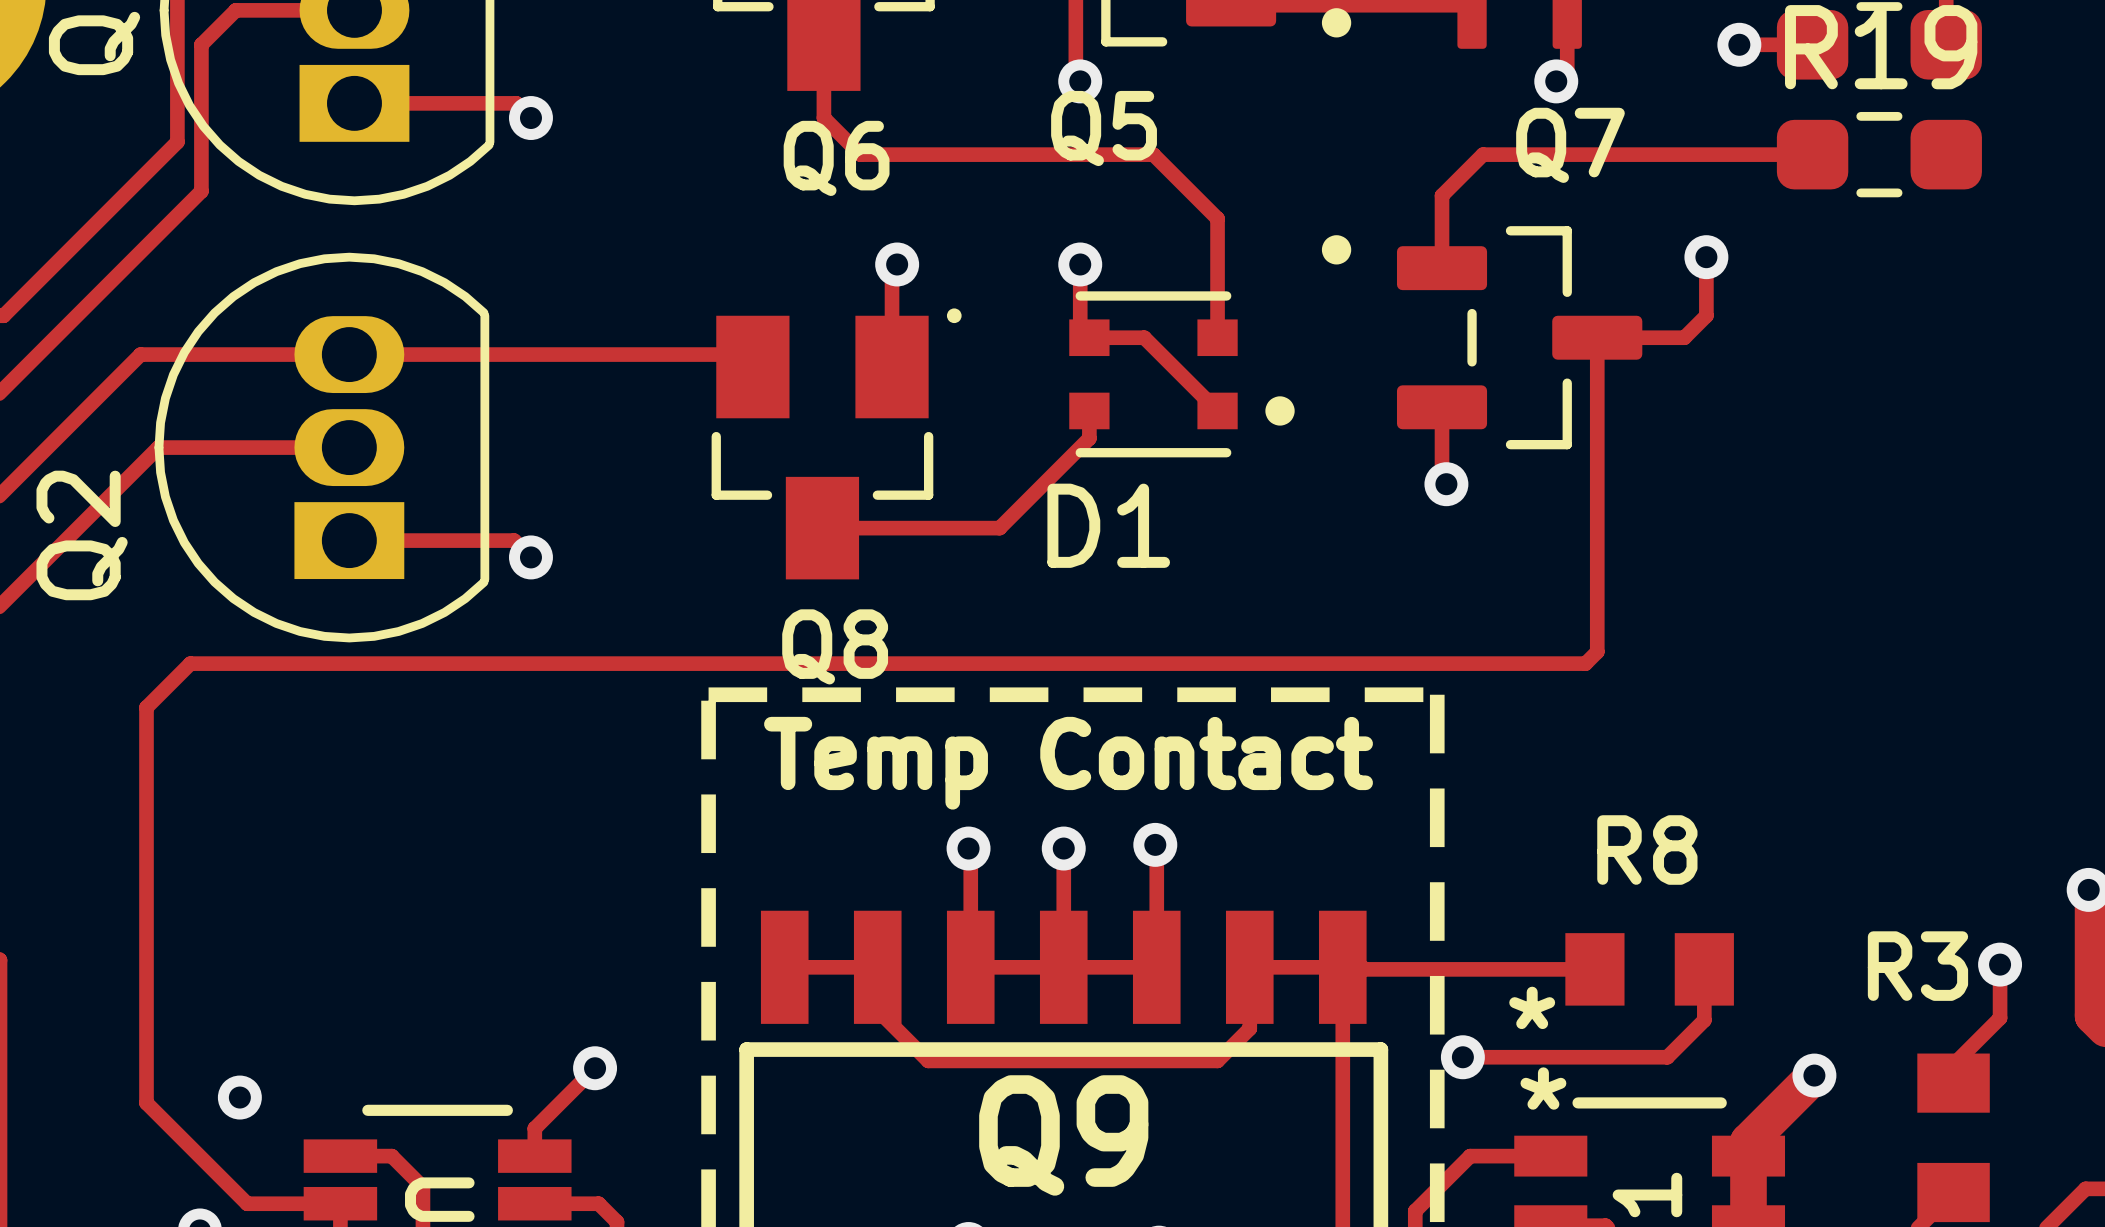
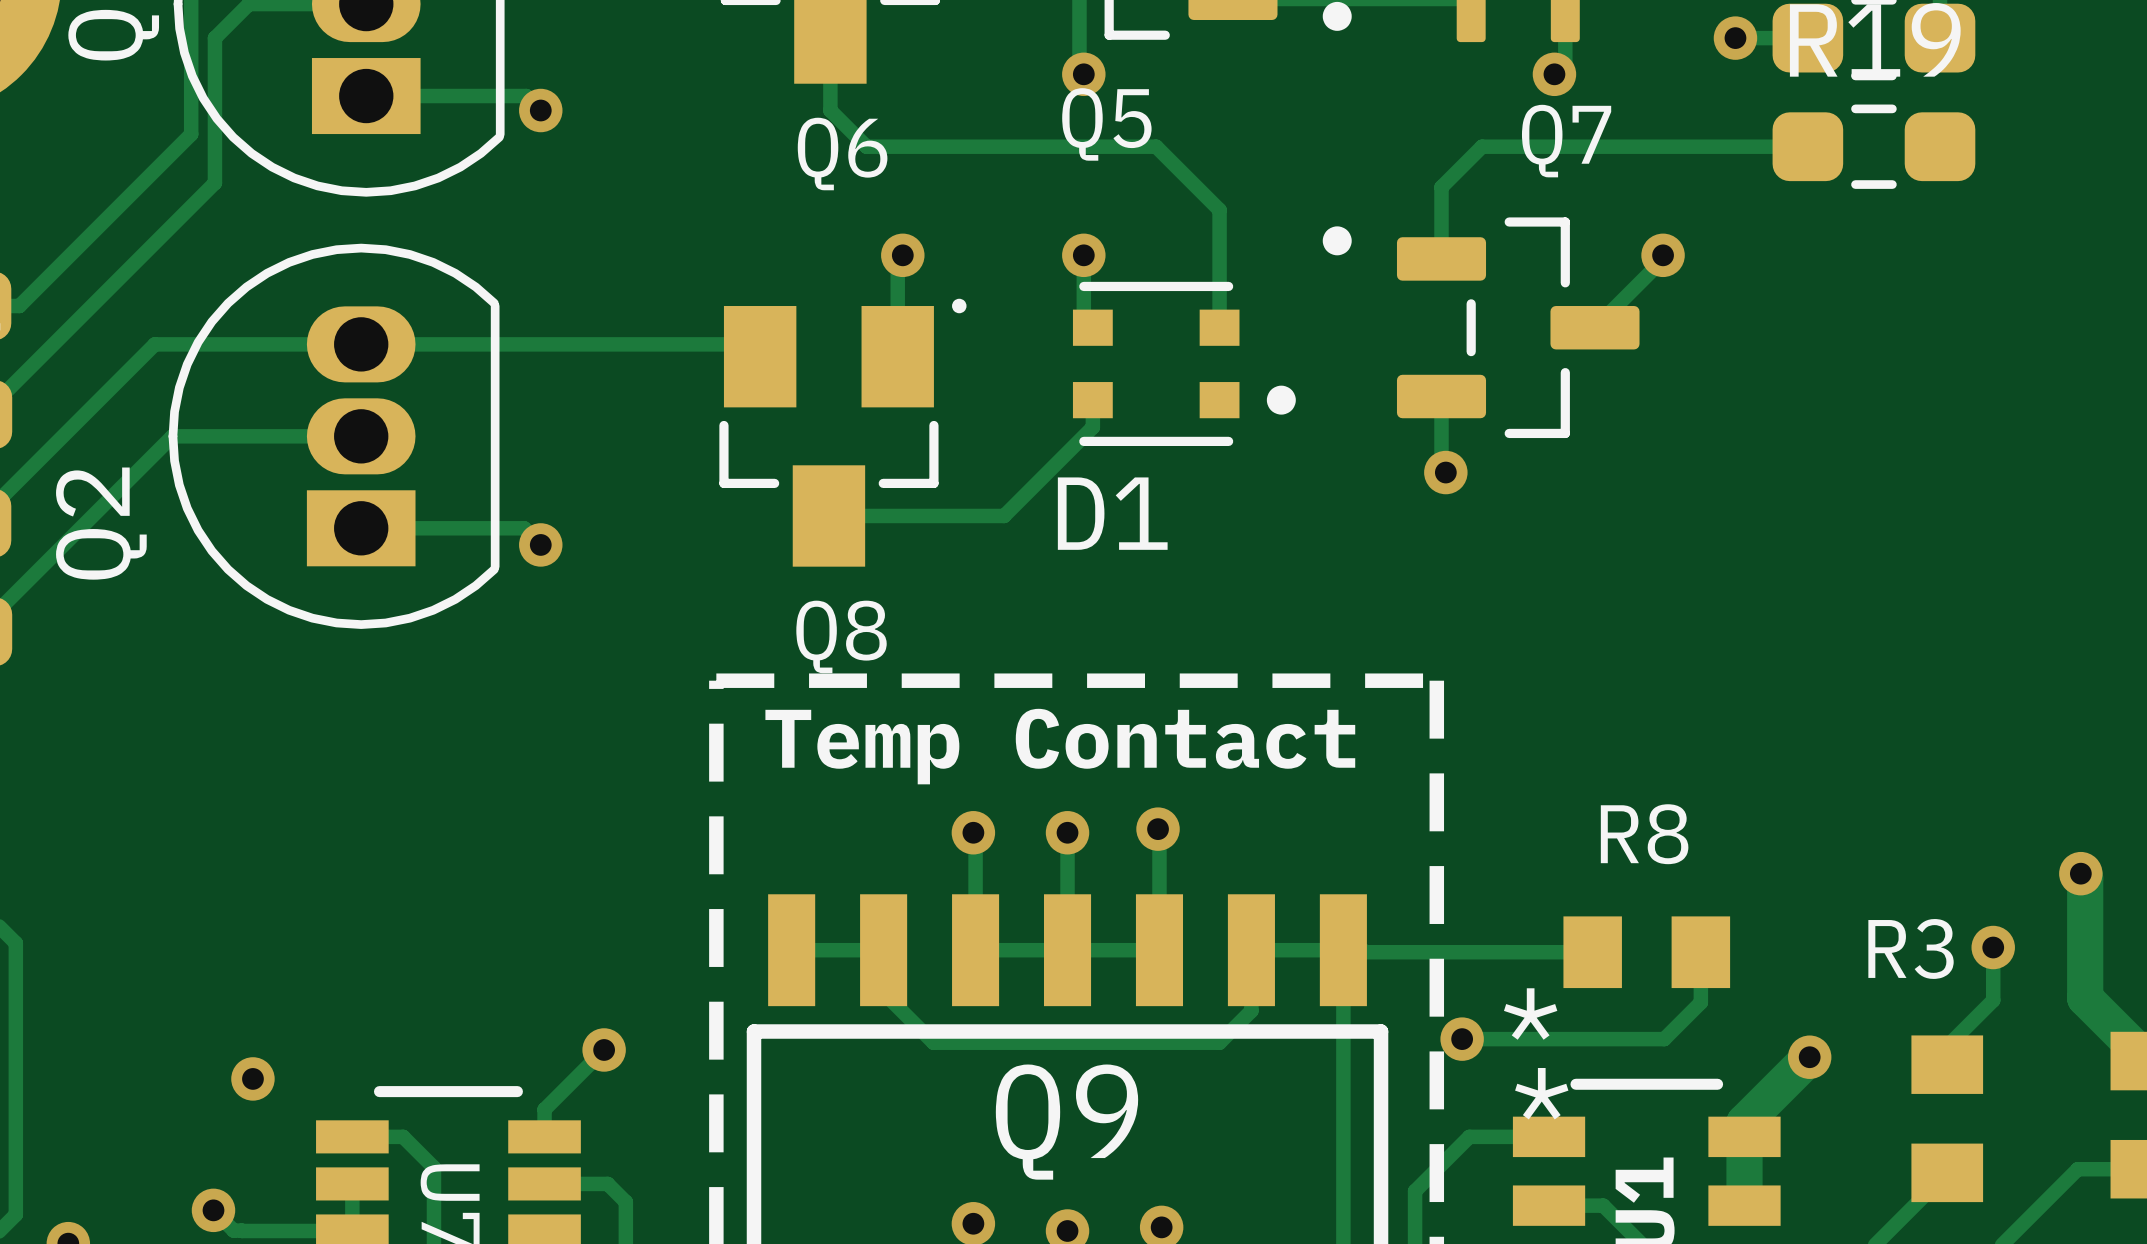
track: (1706, 257) (1706, 315) (1684, 337) (1597, 337) (1597, 651) (1585, 663) (190, 663) (146, 707) (146, 1103) (247, 1203) (340, 1203) -> none
via position: (1706, 257) -> (1663, 255)
track: none -> (1663, 255) (1663, 259) (1595, 327)
track: (1089, 337) (1144, 337) (1217, 410) -> none

